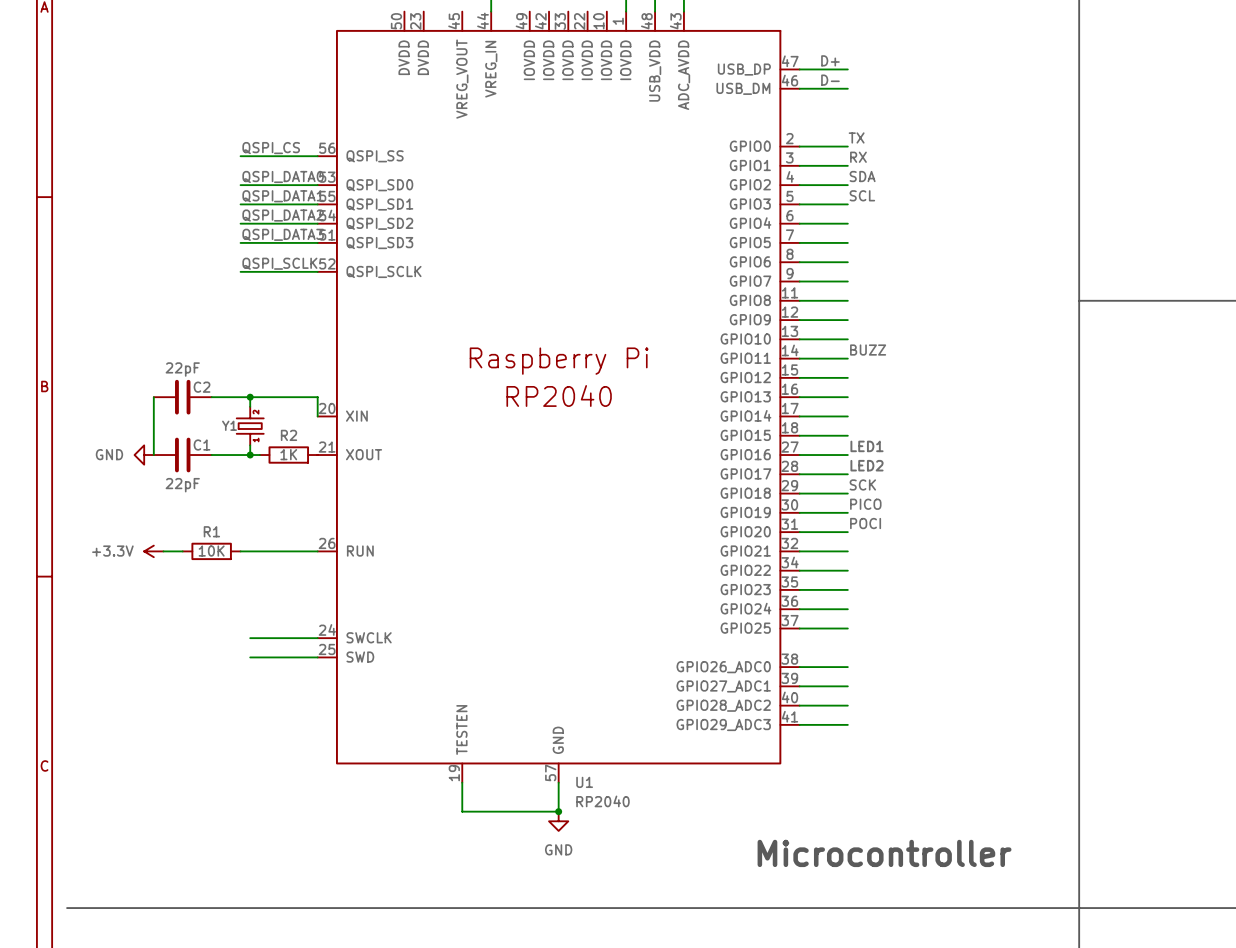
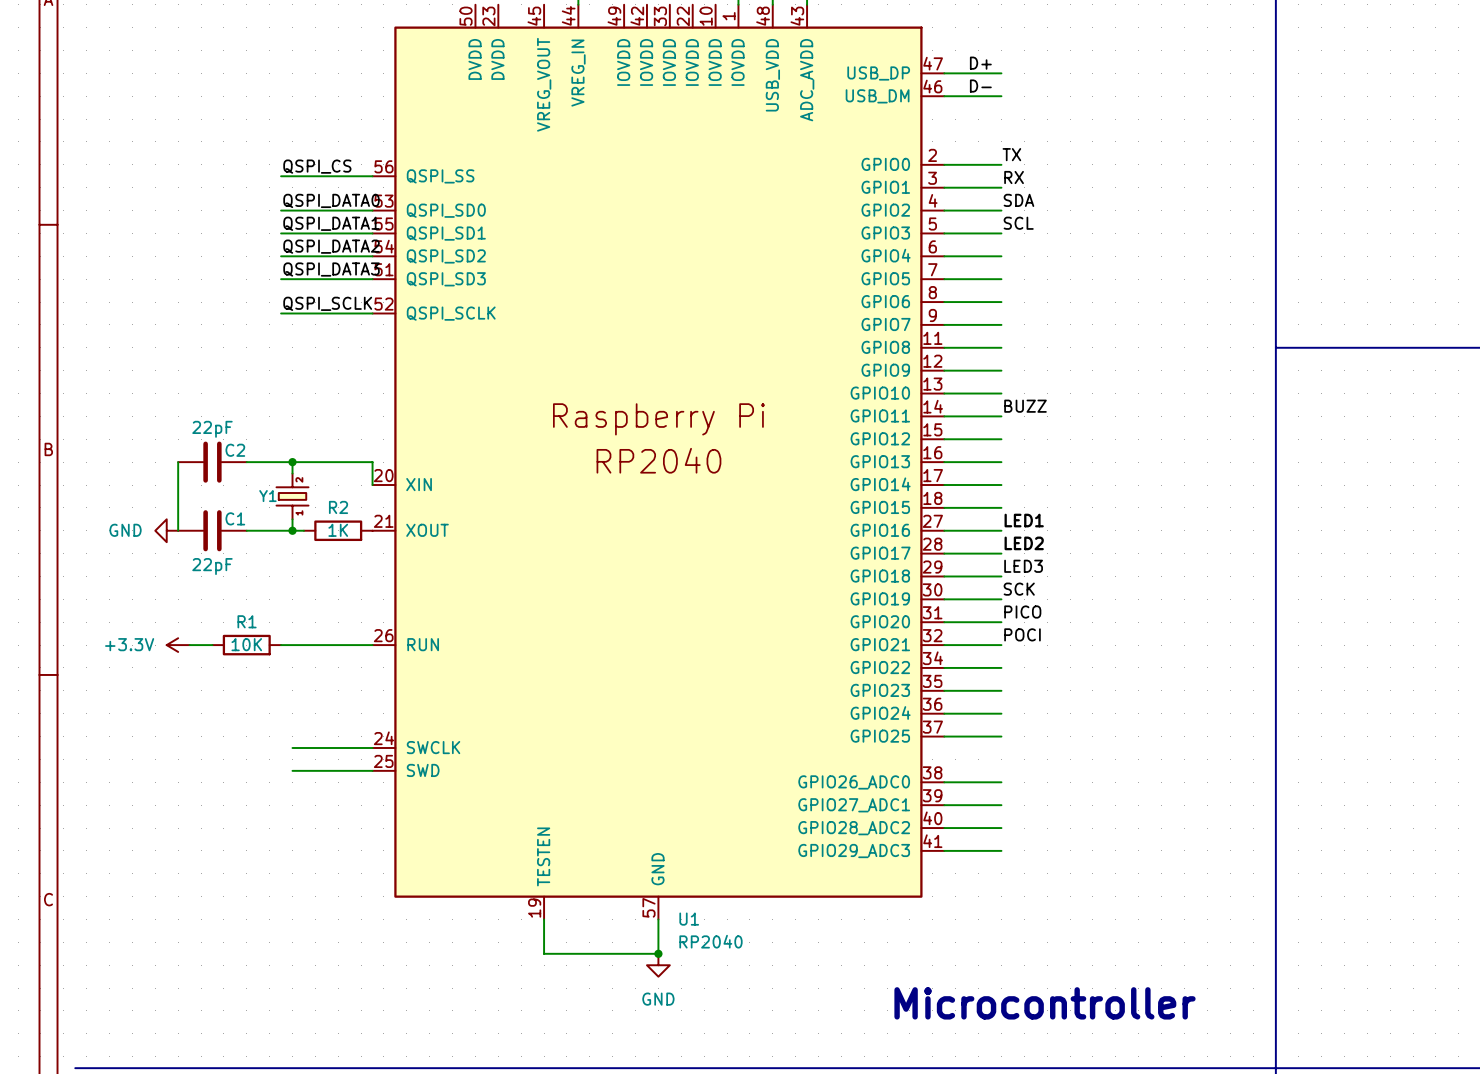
label: SCK (862, 484) -> LED3 (1023, 566)
label: PICO (865, 504) -> SCK (1019, 589)
label: POCI (865, 523) -> PICO (1022, 612)
label: none -> POCI (1022, 634)

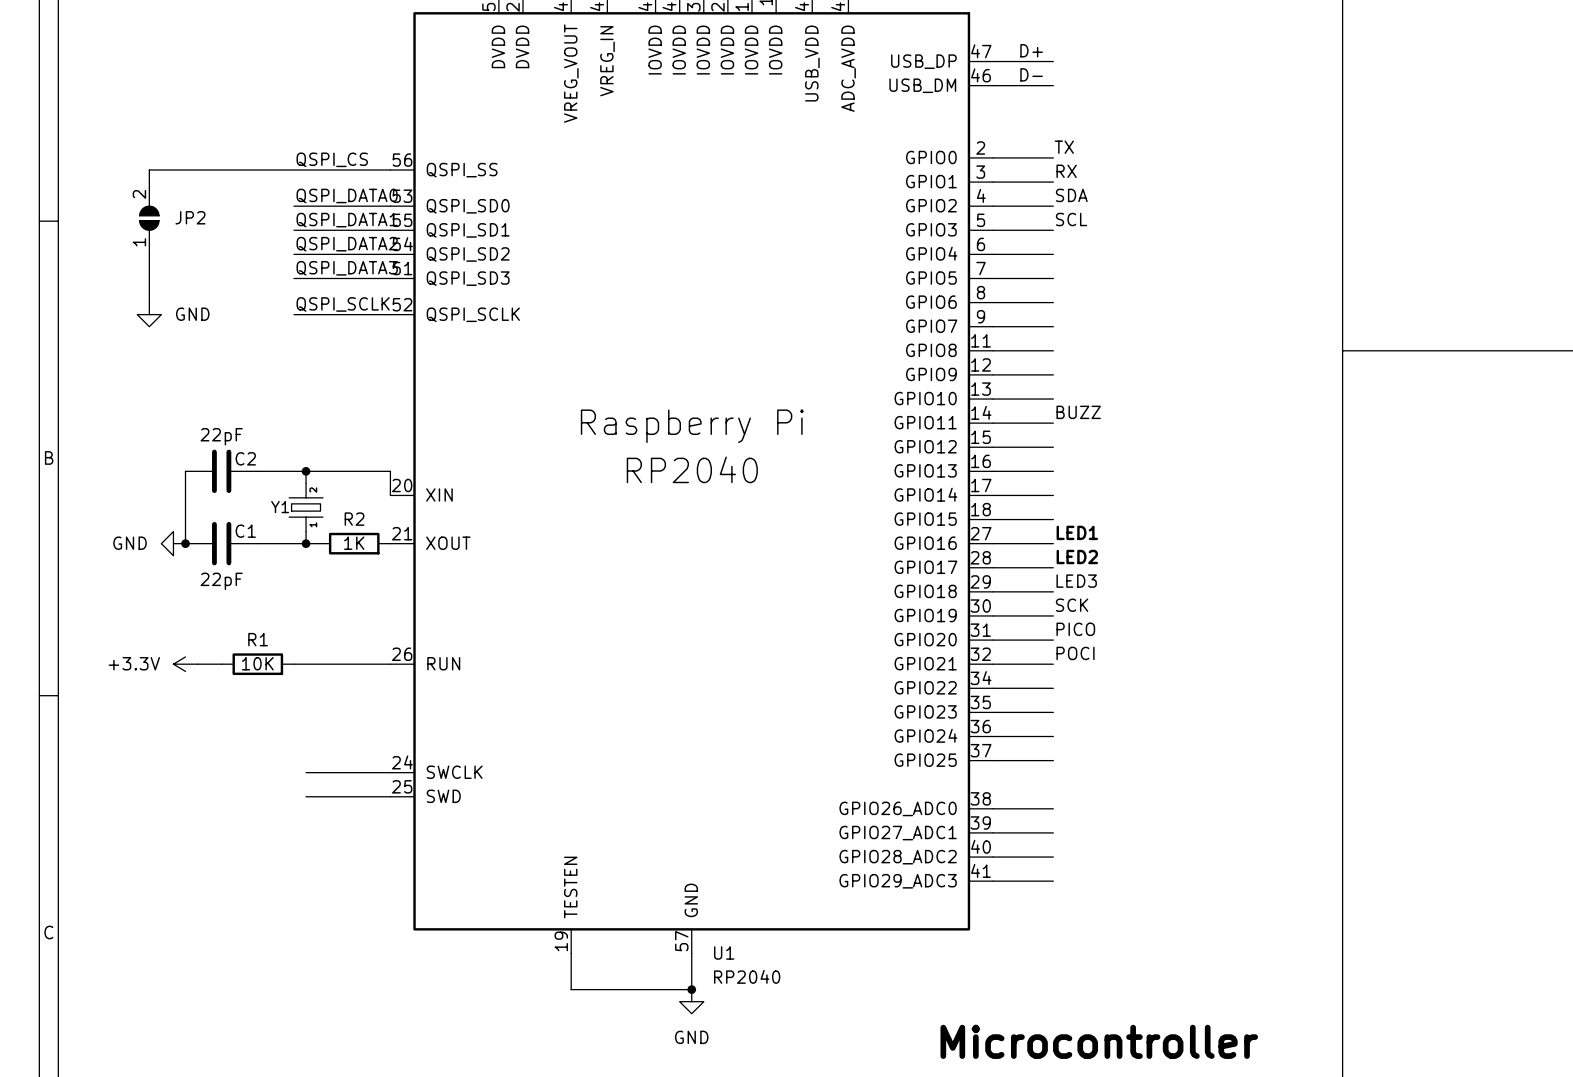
wire: none -> (293, 170) (149, 170) (149, 182)
JP2: none -> (149, 218)
wire: none -> (149, 254) (149, 302)
power symbol: none -> GND (149, 314)
junction: none -> (185, 543)

